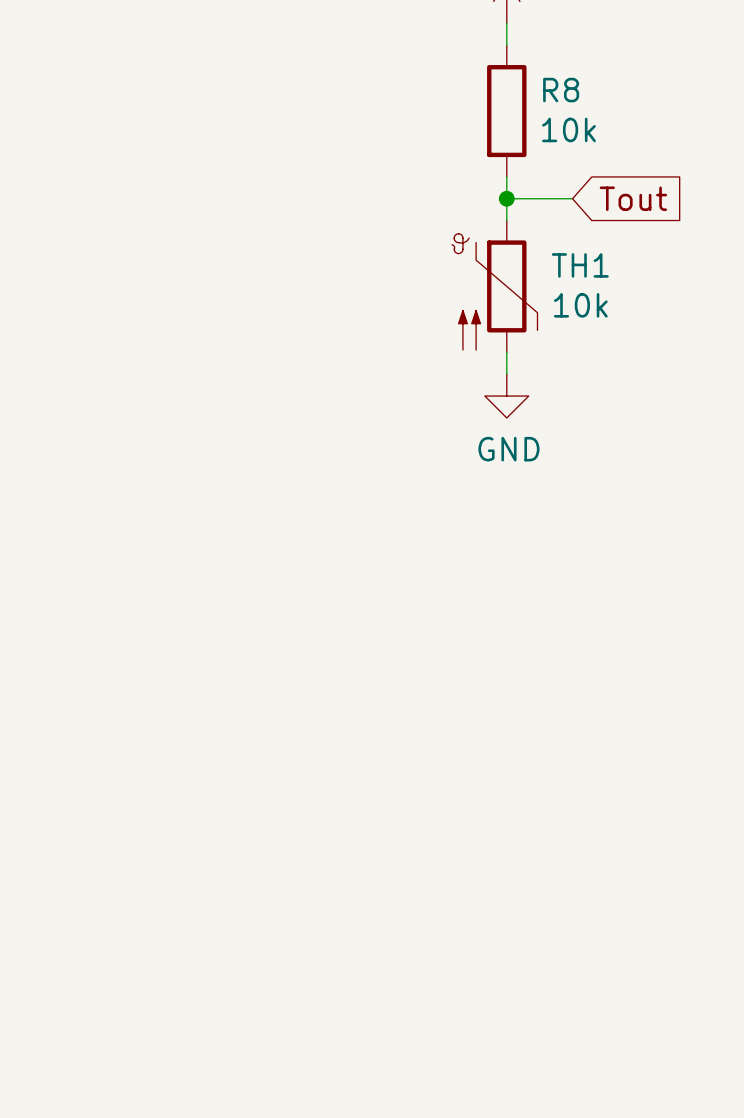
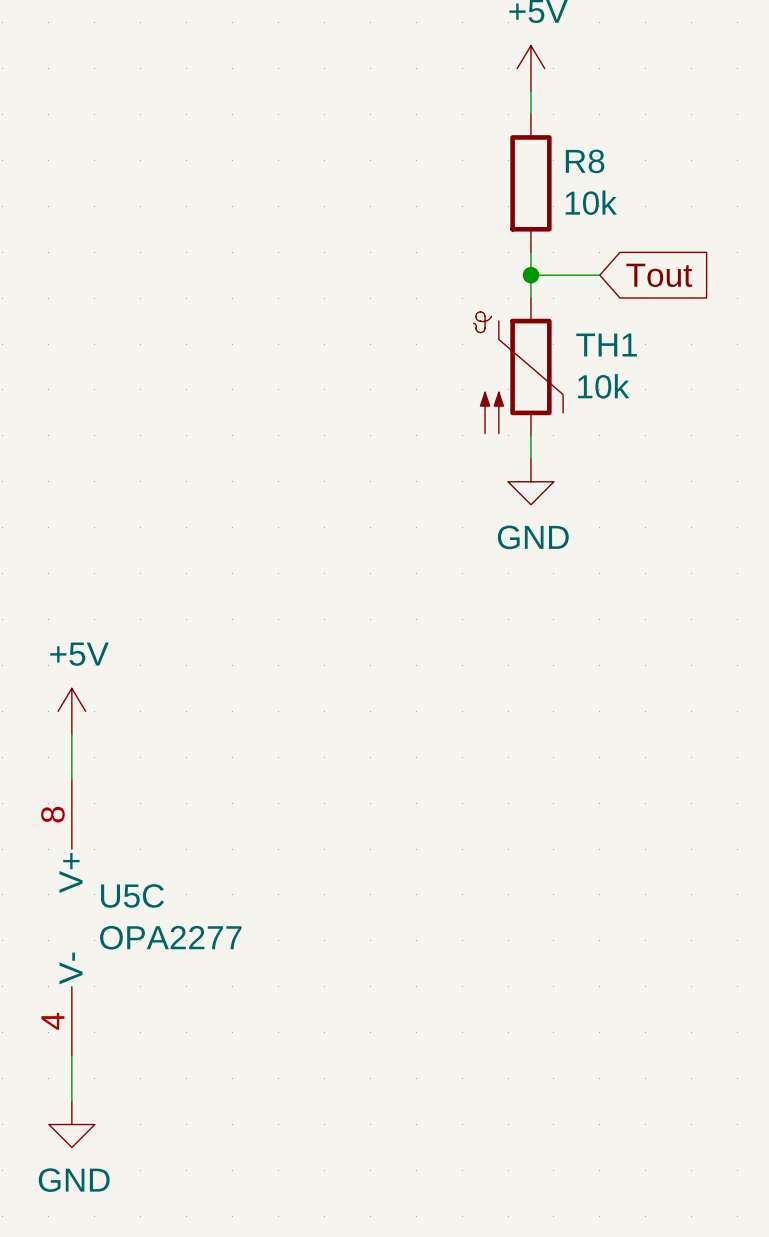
power symbol: none -> +5V (71, 711)
wire: none -> (71, 734) (71, 780)
U5C: none -> OPA2277 (71, 917)
wire: none -> (71, 1055) (71, 1101)
power symbol: none -> GND (71, 1124)

